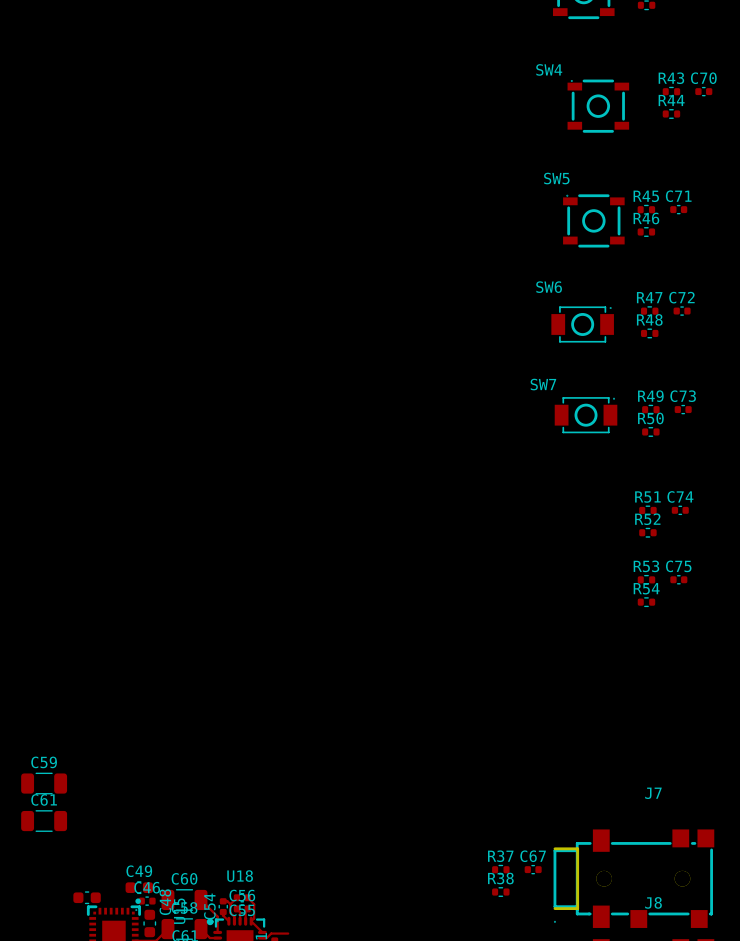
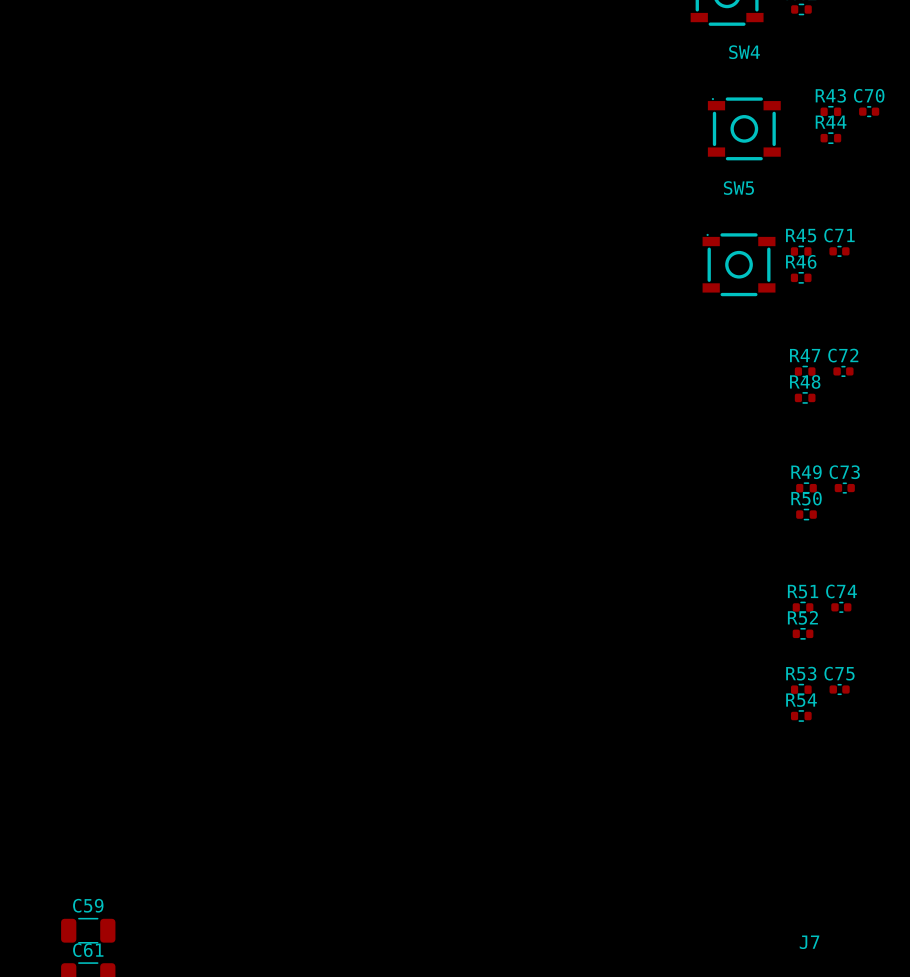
SW4 name position: SW4 (549, 69) -> SW4 (744, 52)
SW5 name position: SW5 (556, 178) -> SW5 (738, 188)
SW6: (582, 324) -> none
SW7: (586, 415) -> none

